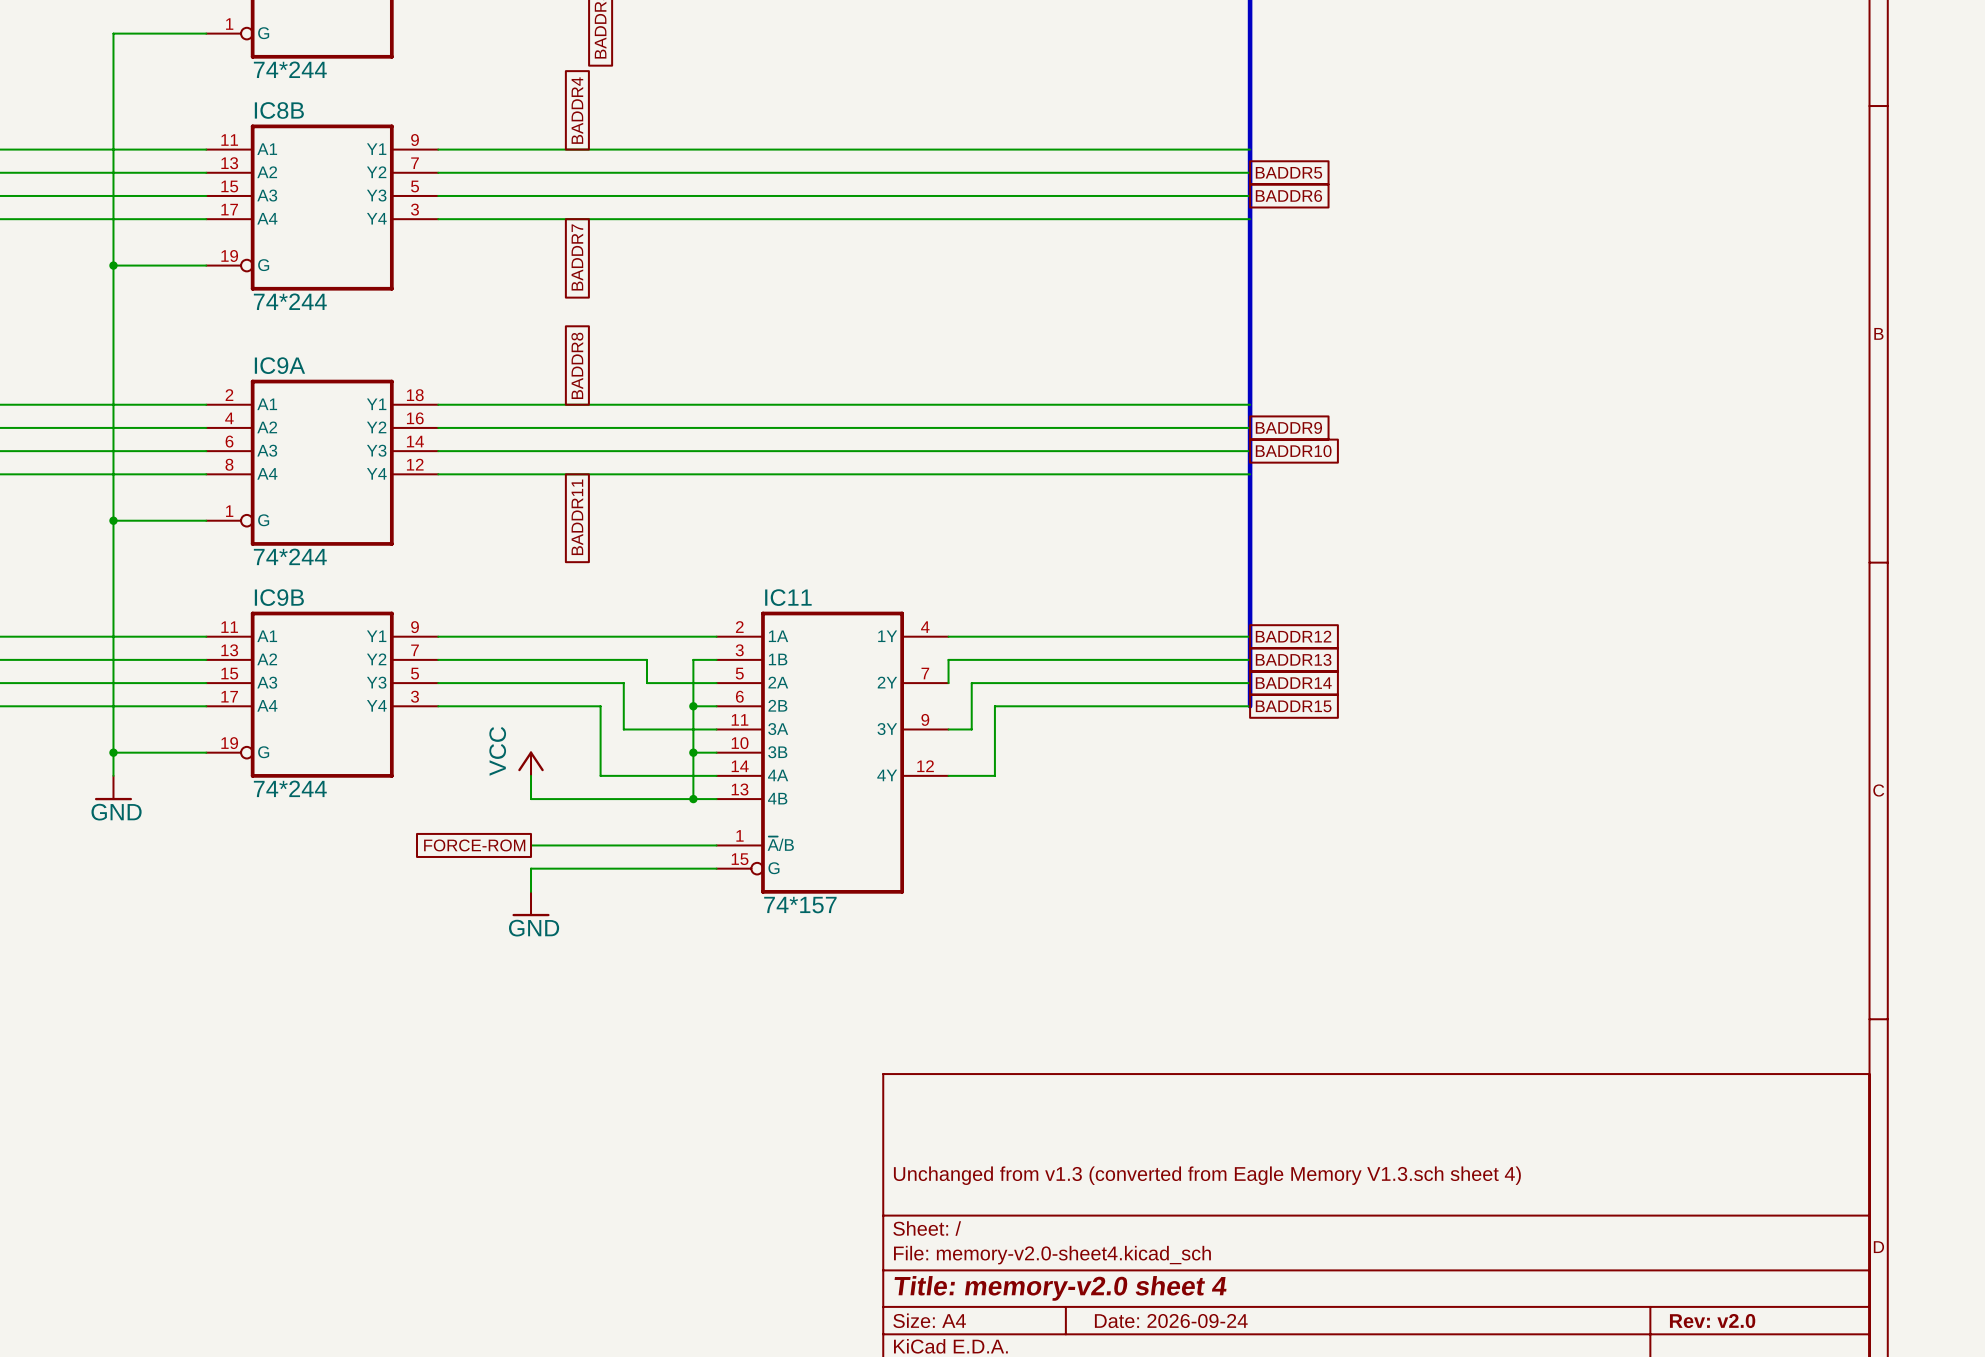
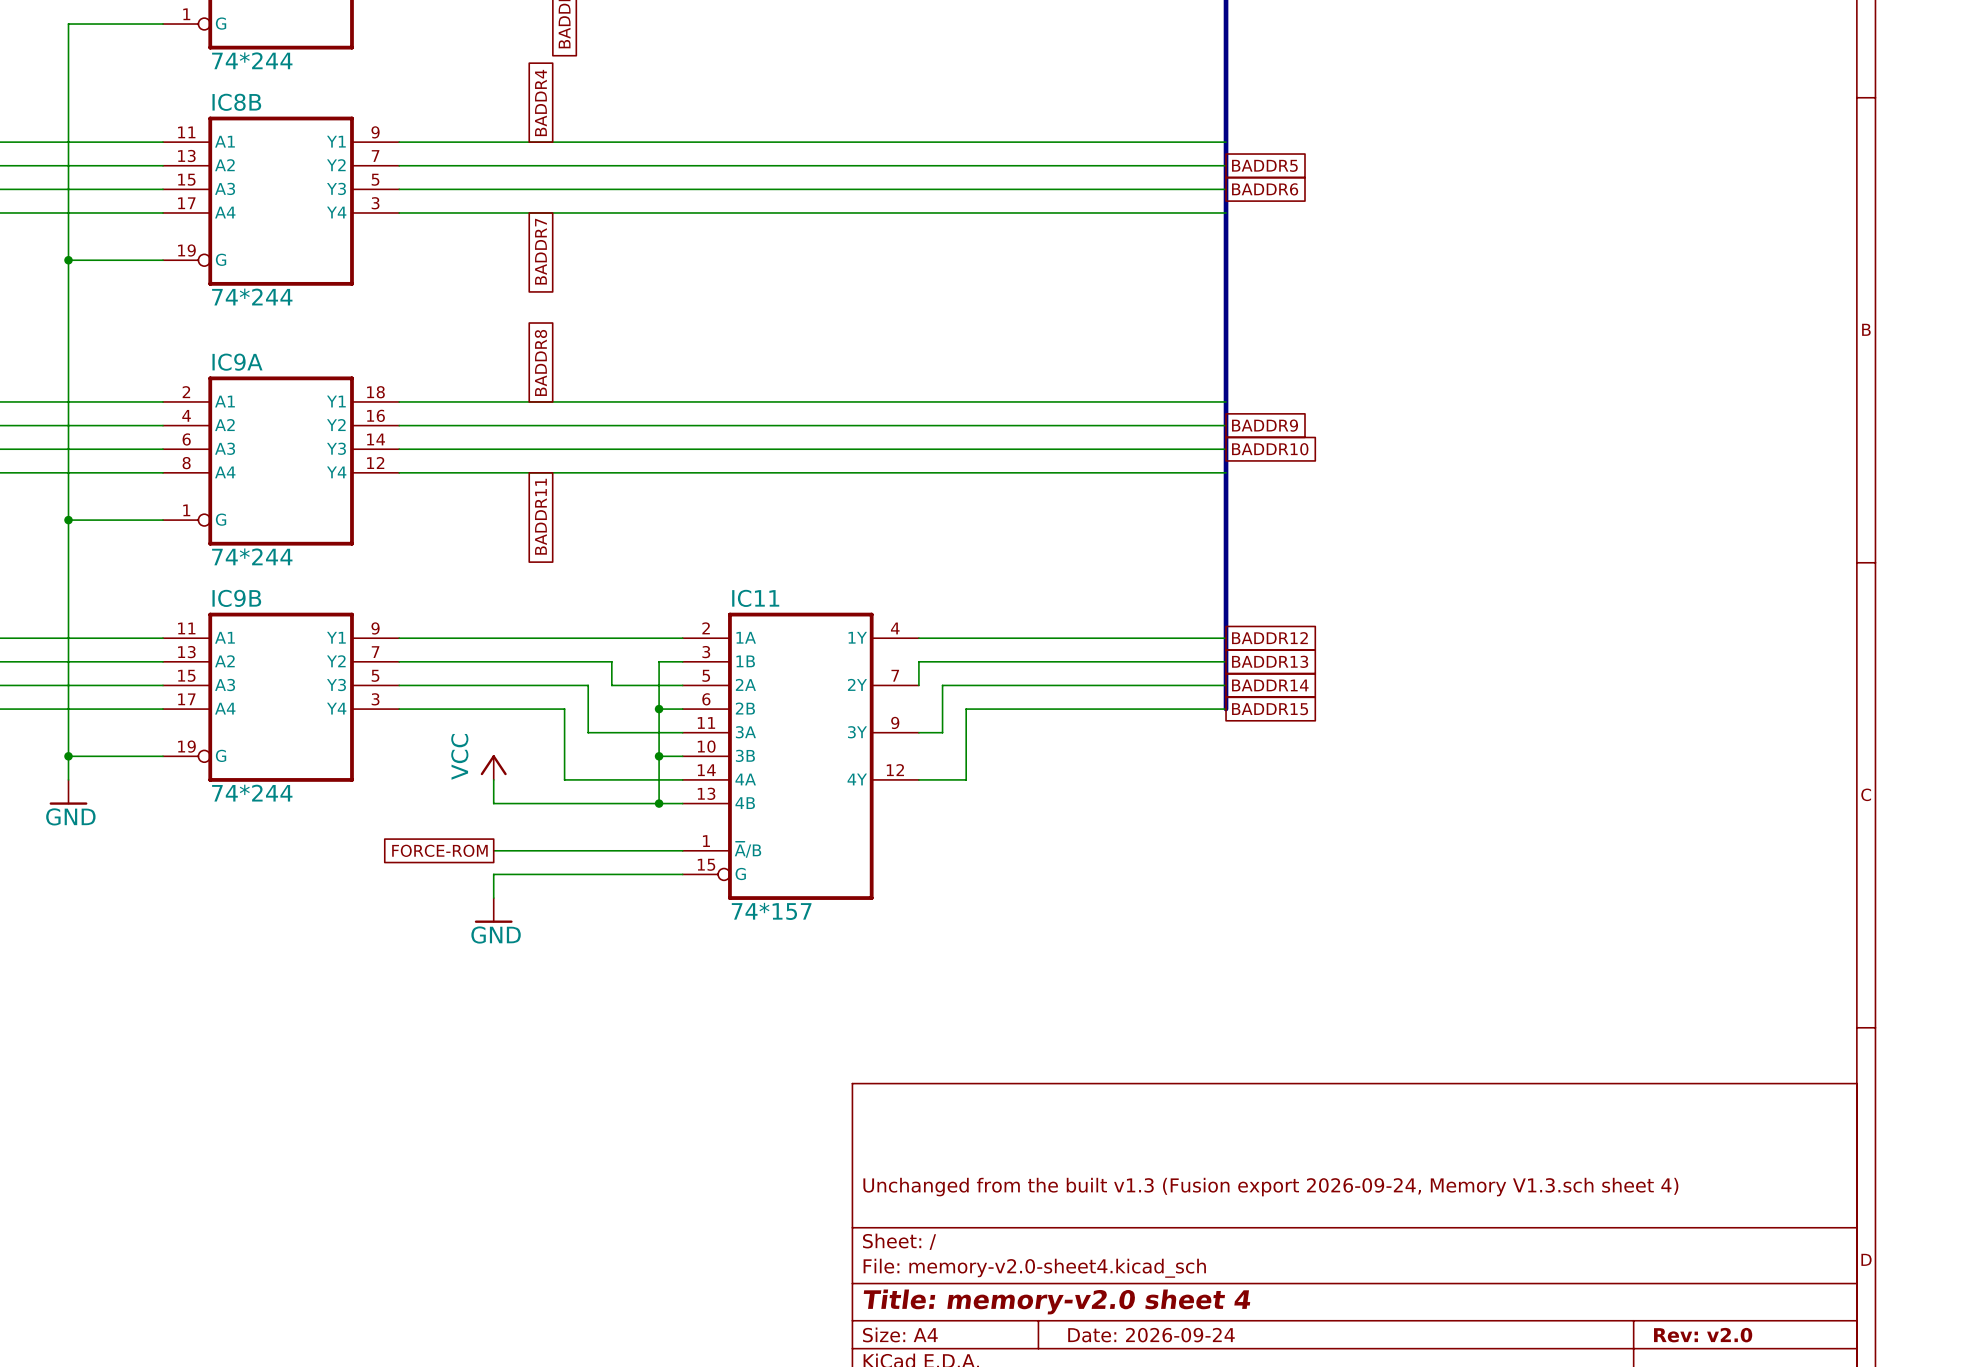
title block: Unchanged from v1.3 (converted from Eagle Memory V1.3.sch sheet 4) (1207, 1175) -> Unchanged from the built v1.3 (Fusion export 2026-09-24, Memory V1.3.sch sheet 4) (1270, 1187)

